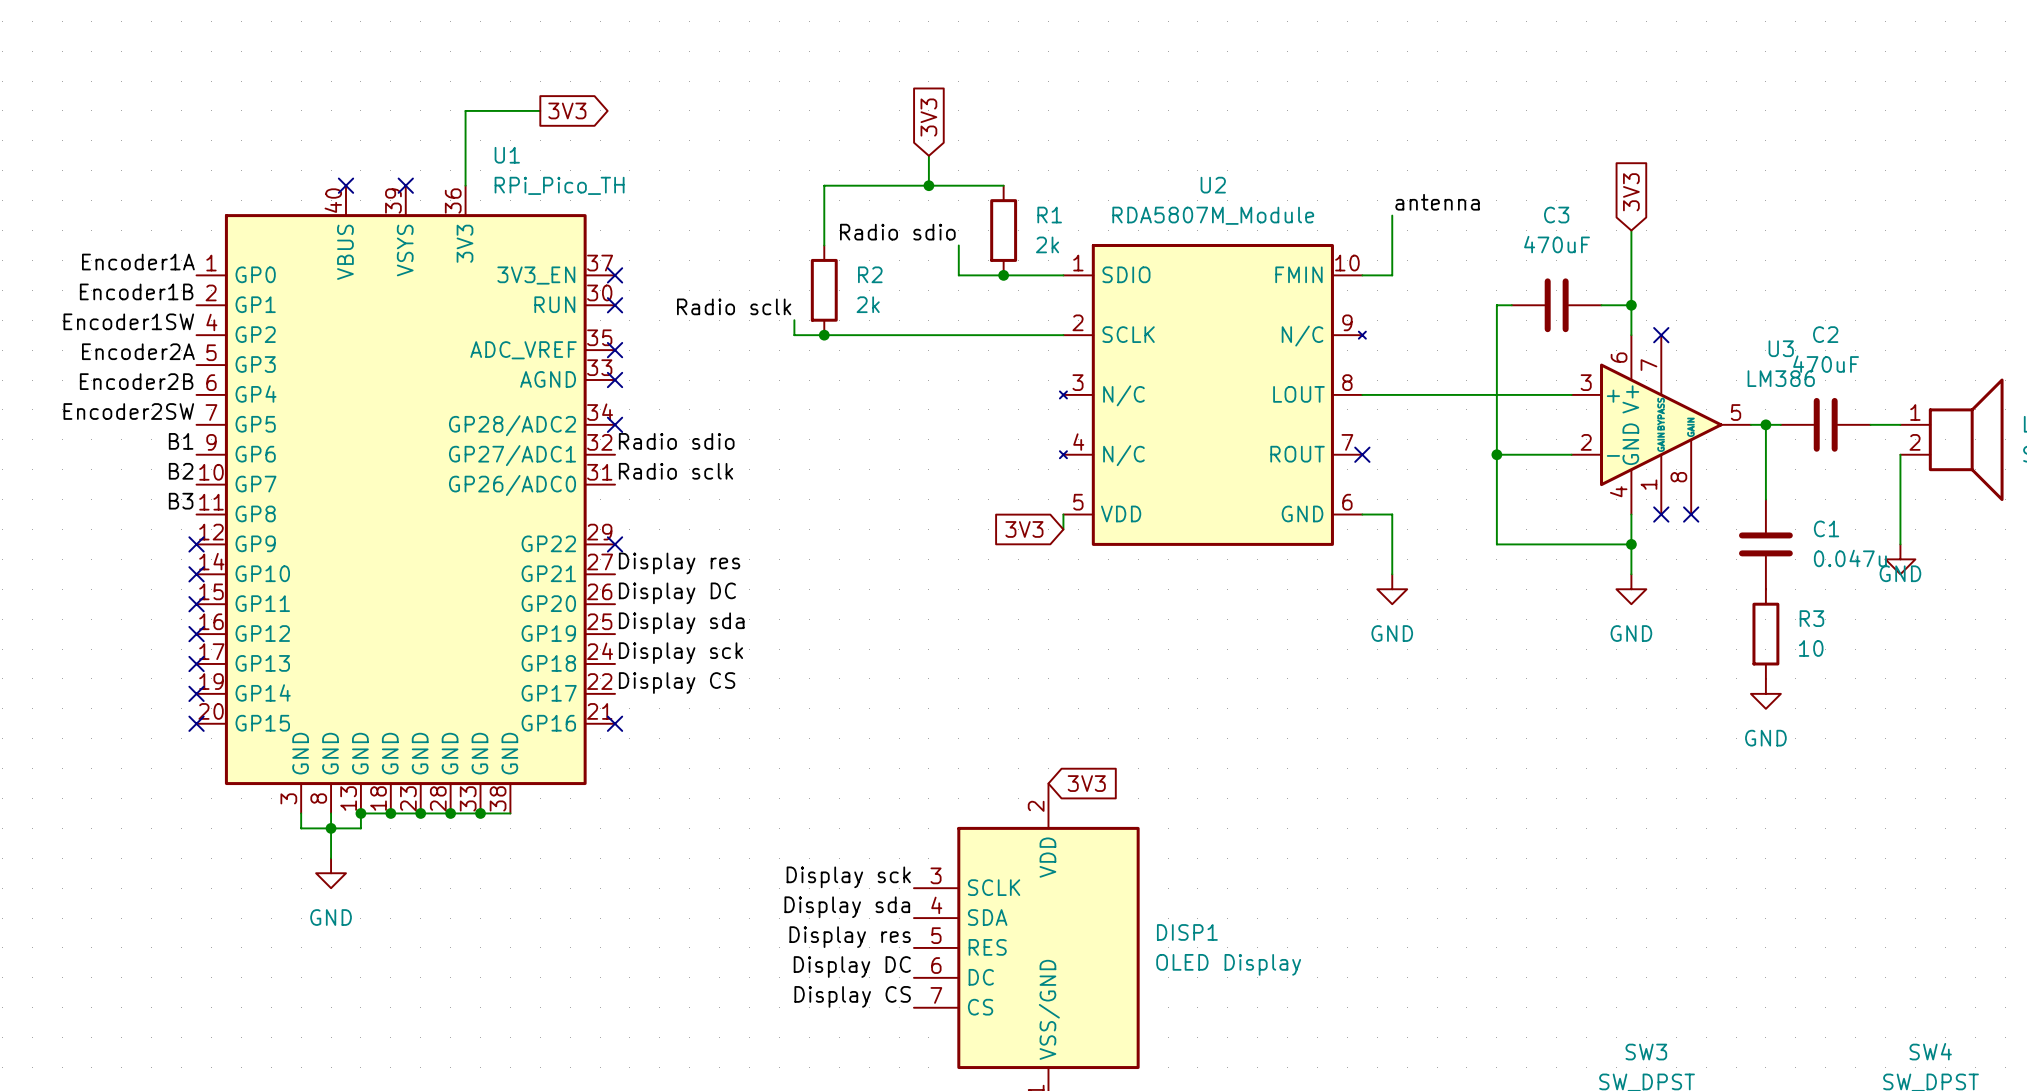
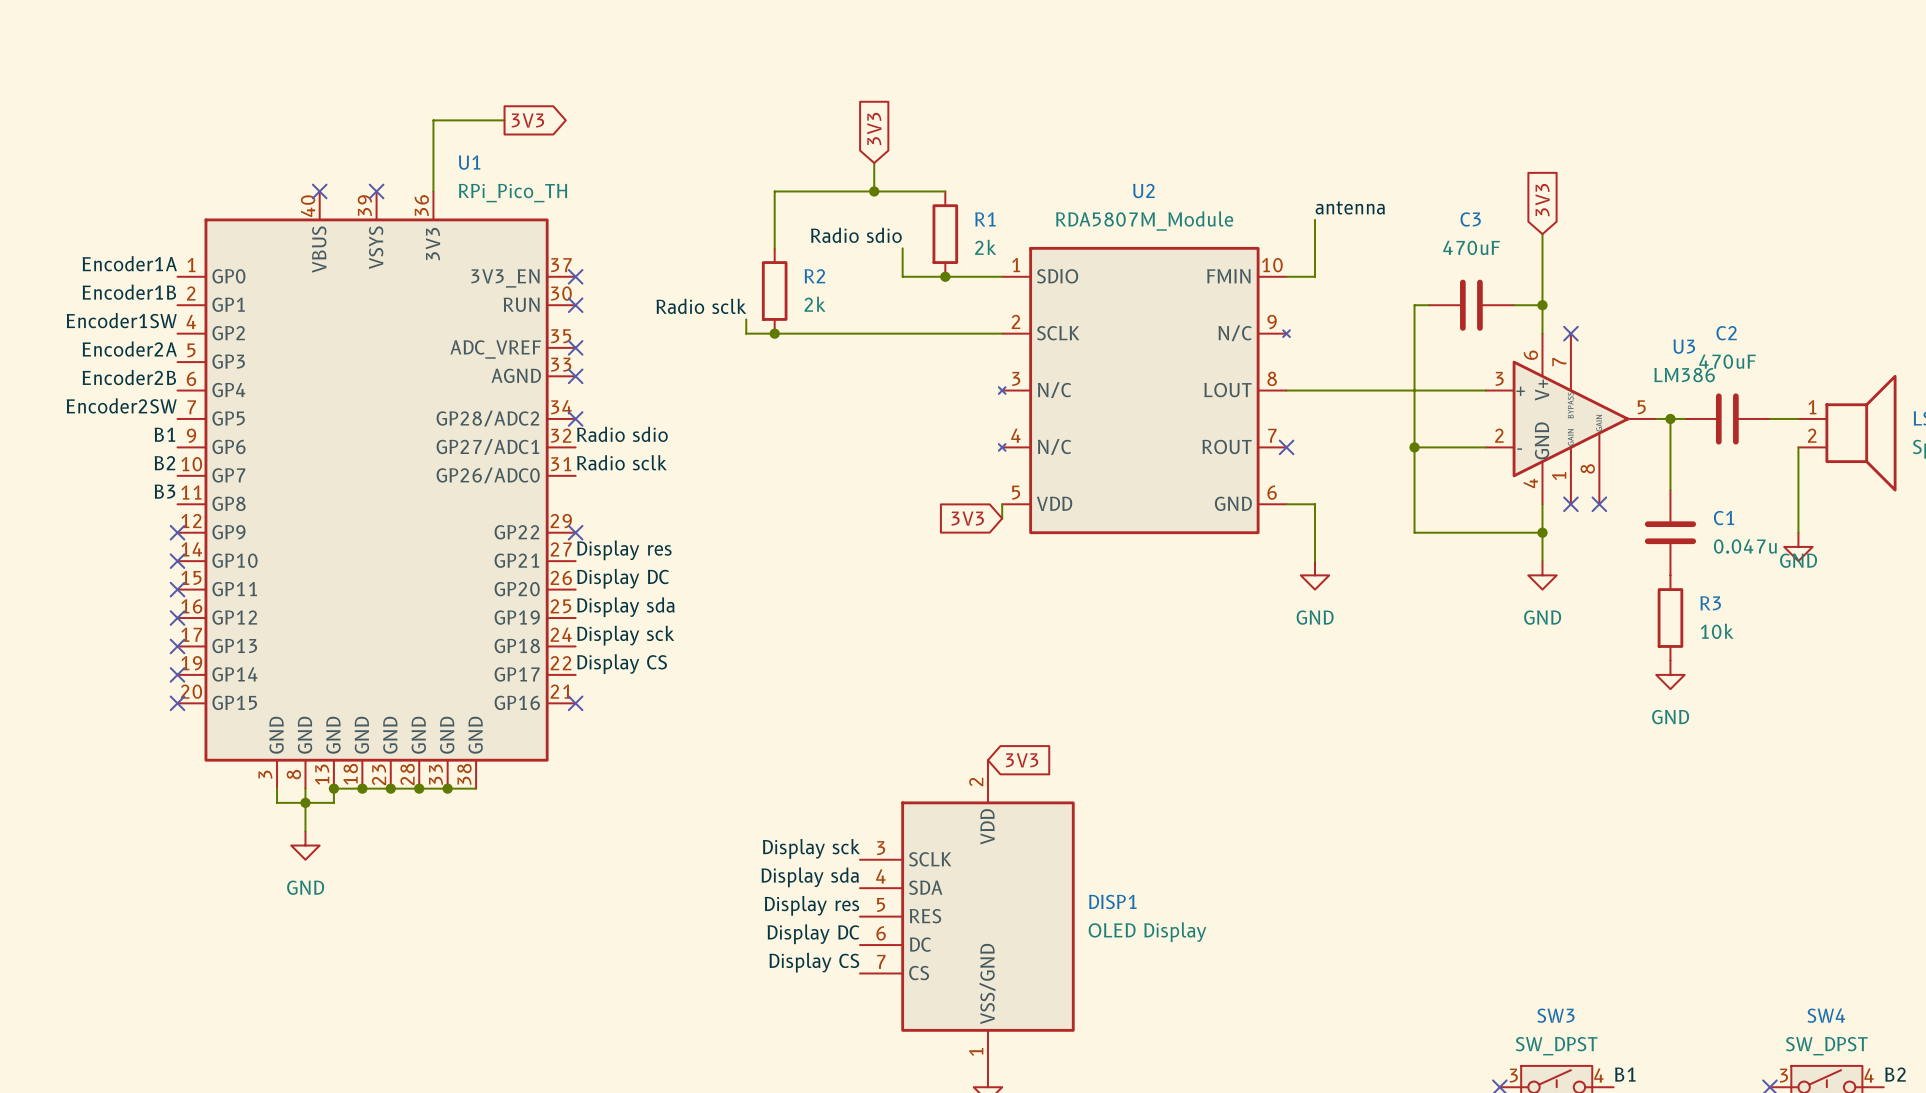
R3 value: 10 (1811, 648) -> 10k (1717, 631)

